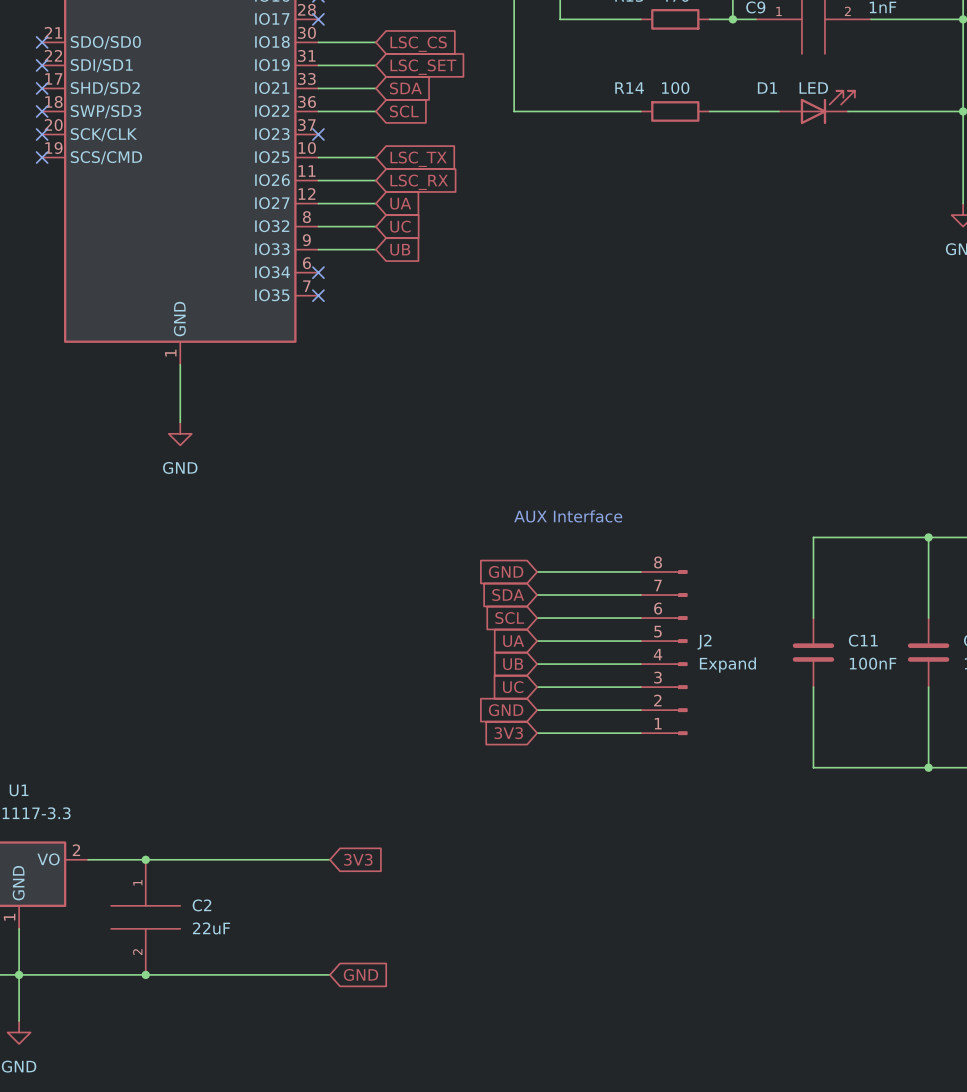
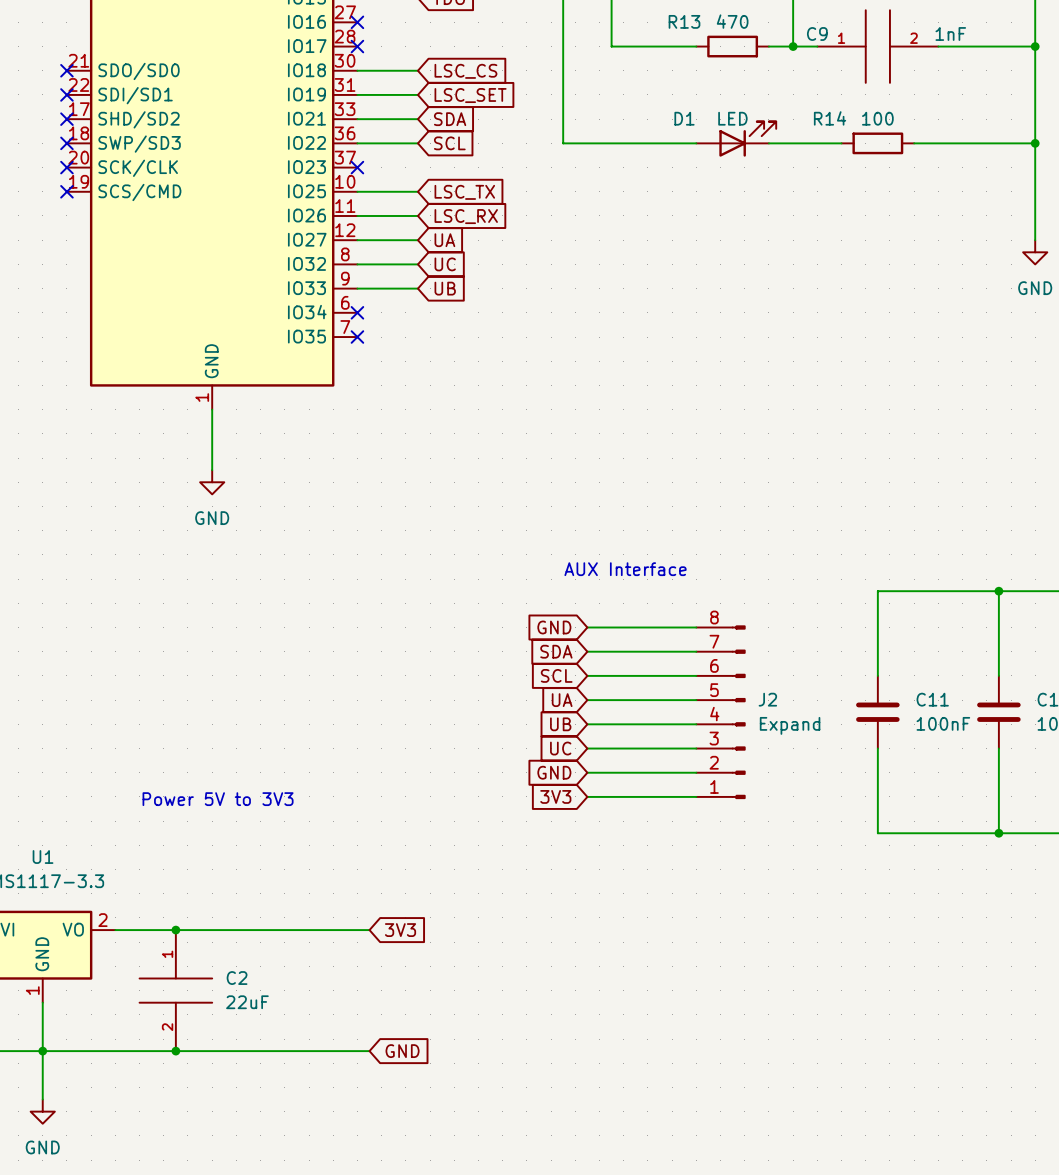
D1 position: (816, 107) -> (736, 139)
R14 position: (675, 111) -> (877, 143)
text: none -> Power 5V to 3V3 (218, 799)

